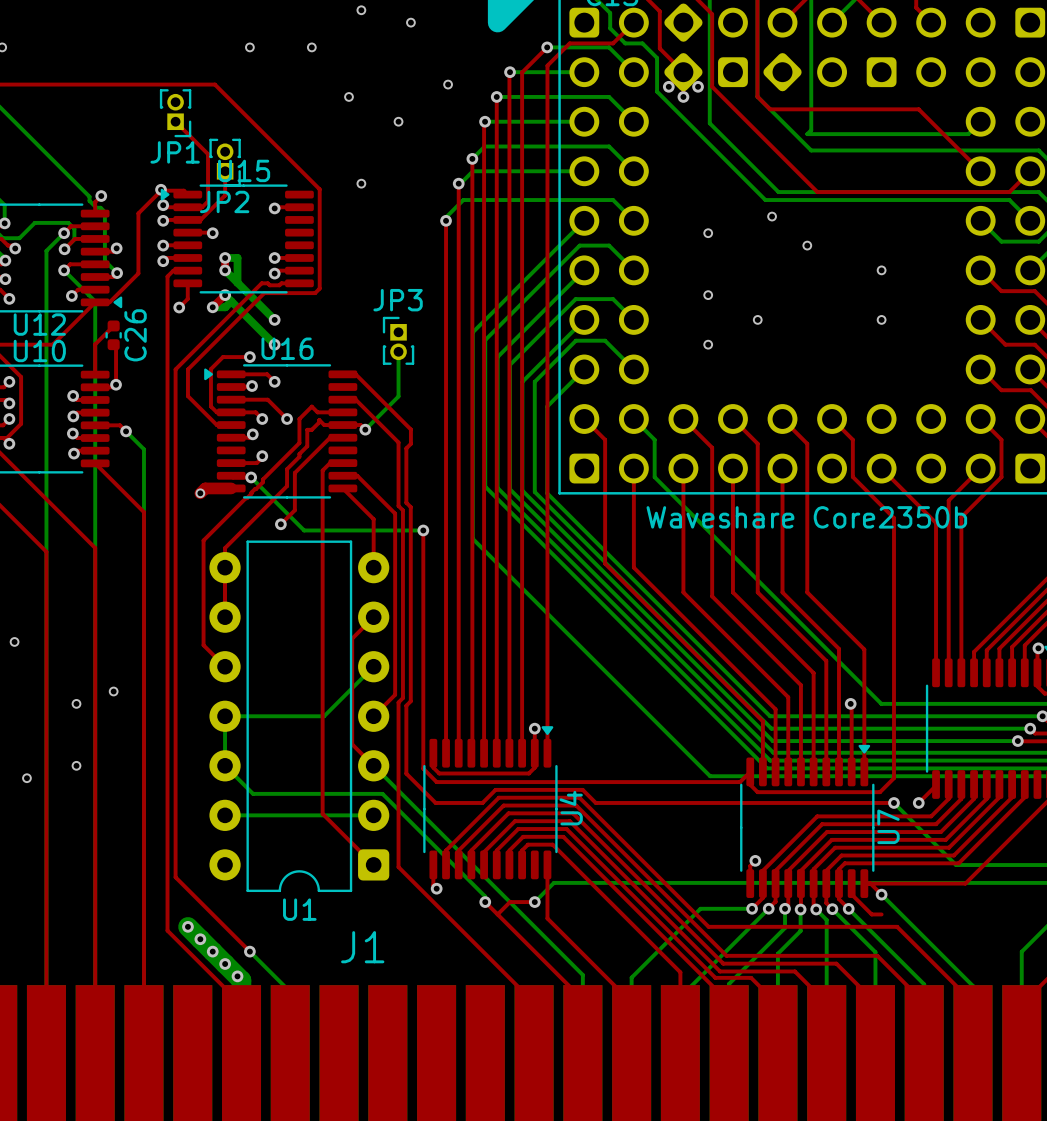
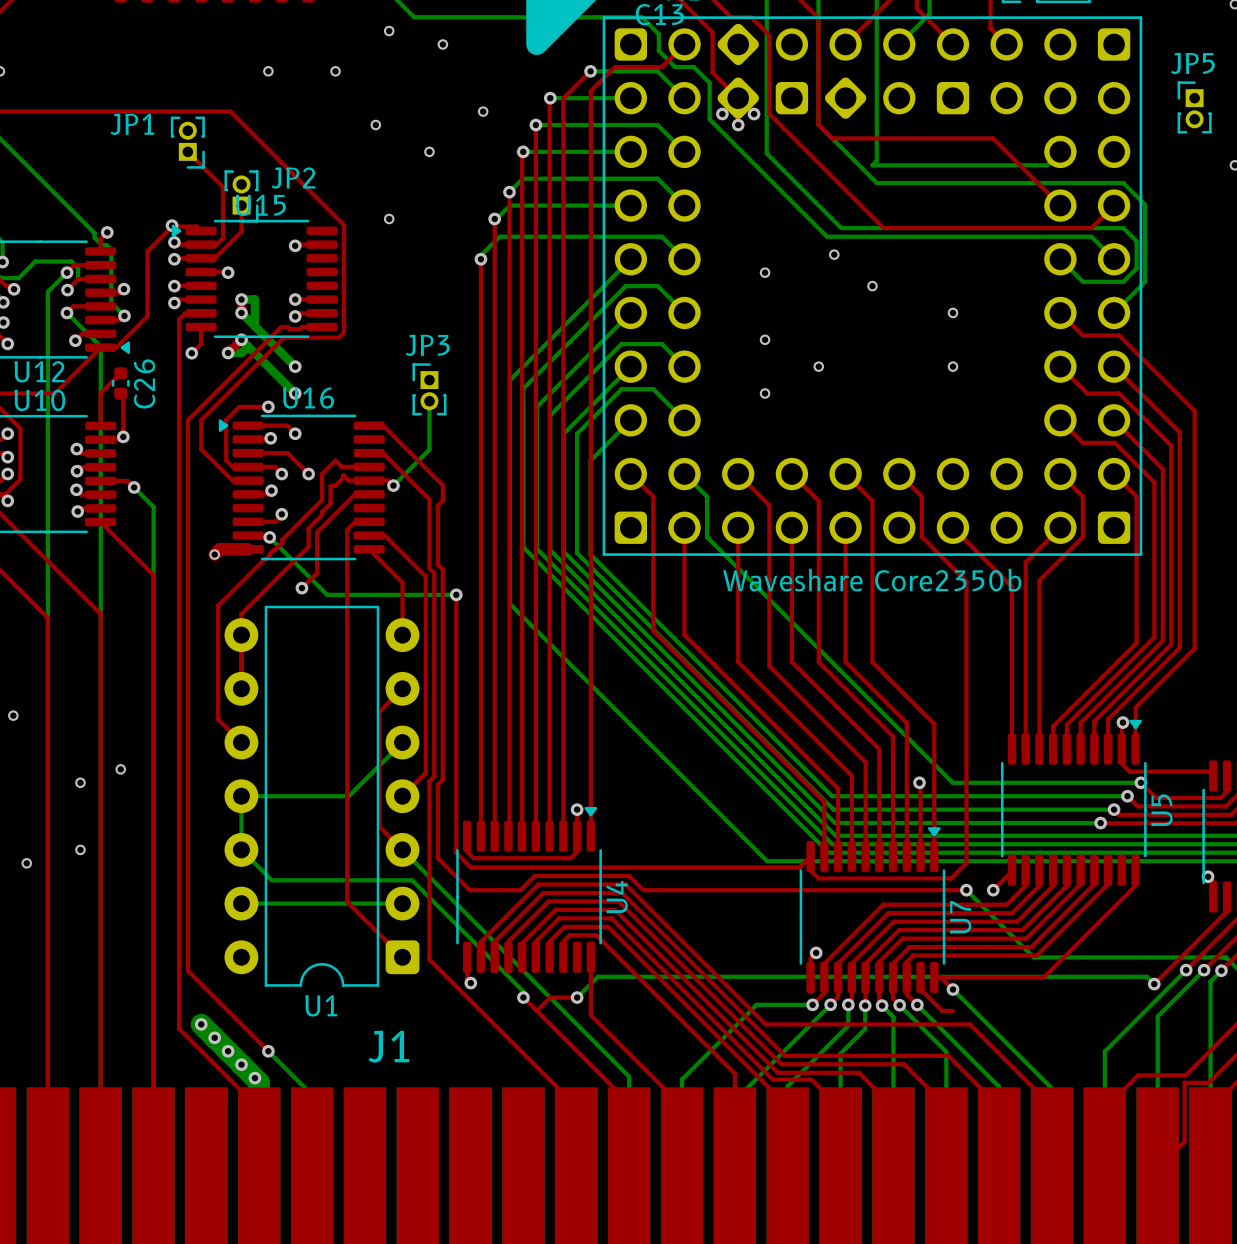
JP1 name position: JP1 (175, 152) -> JP1 (132, 124)
JP2 name position: JP2 (224, 201) -> JP2 (293, 178)

